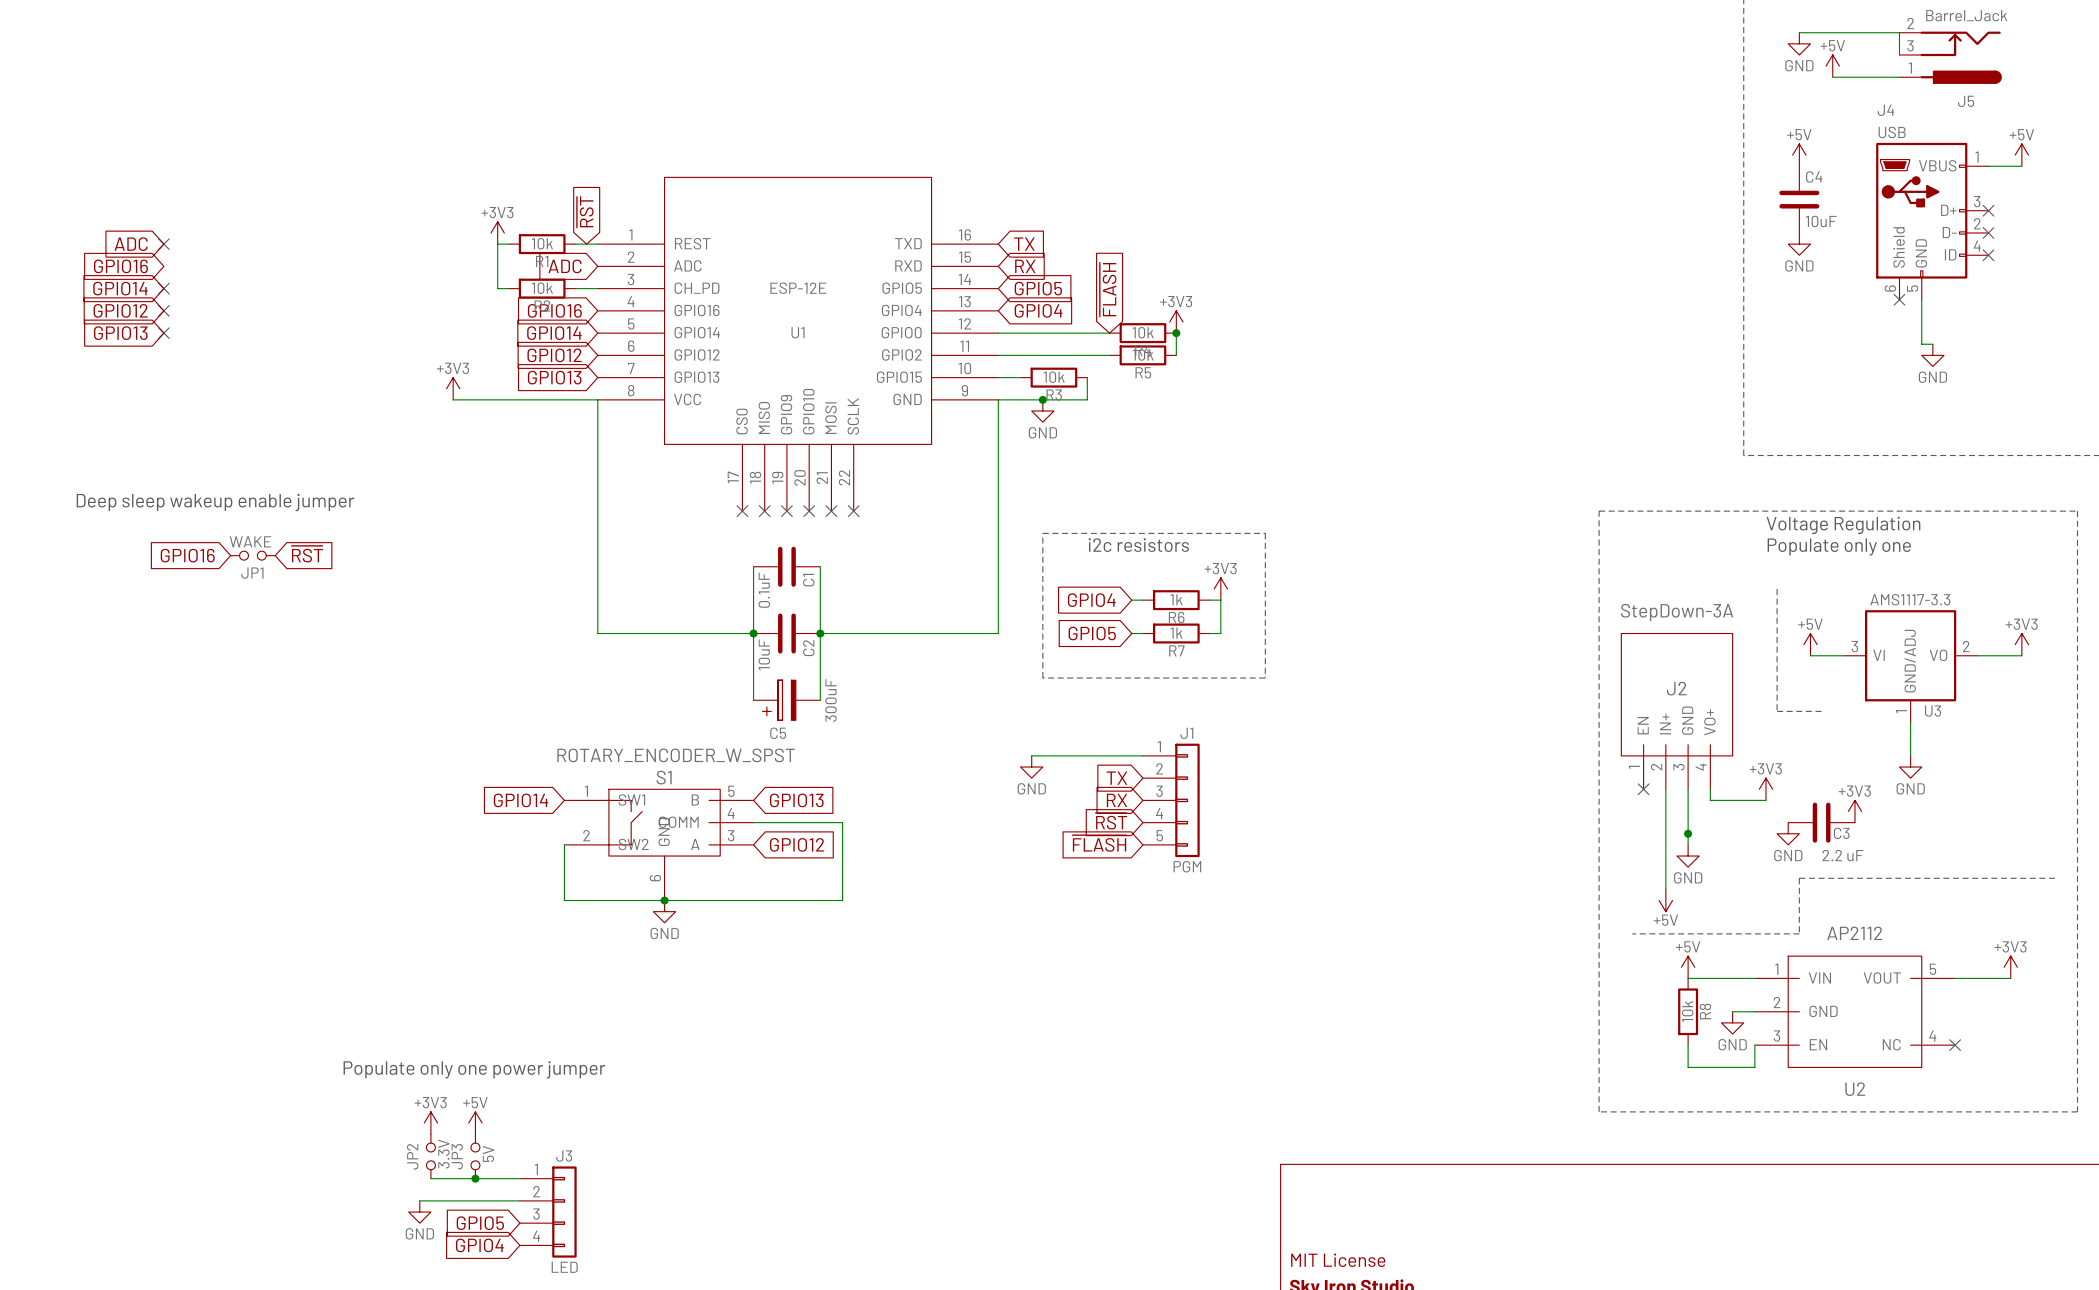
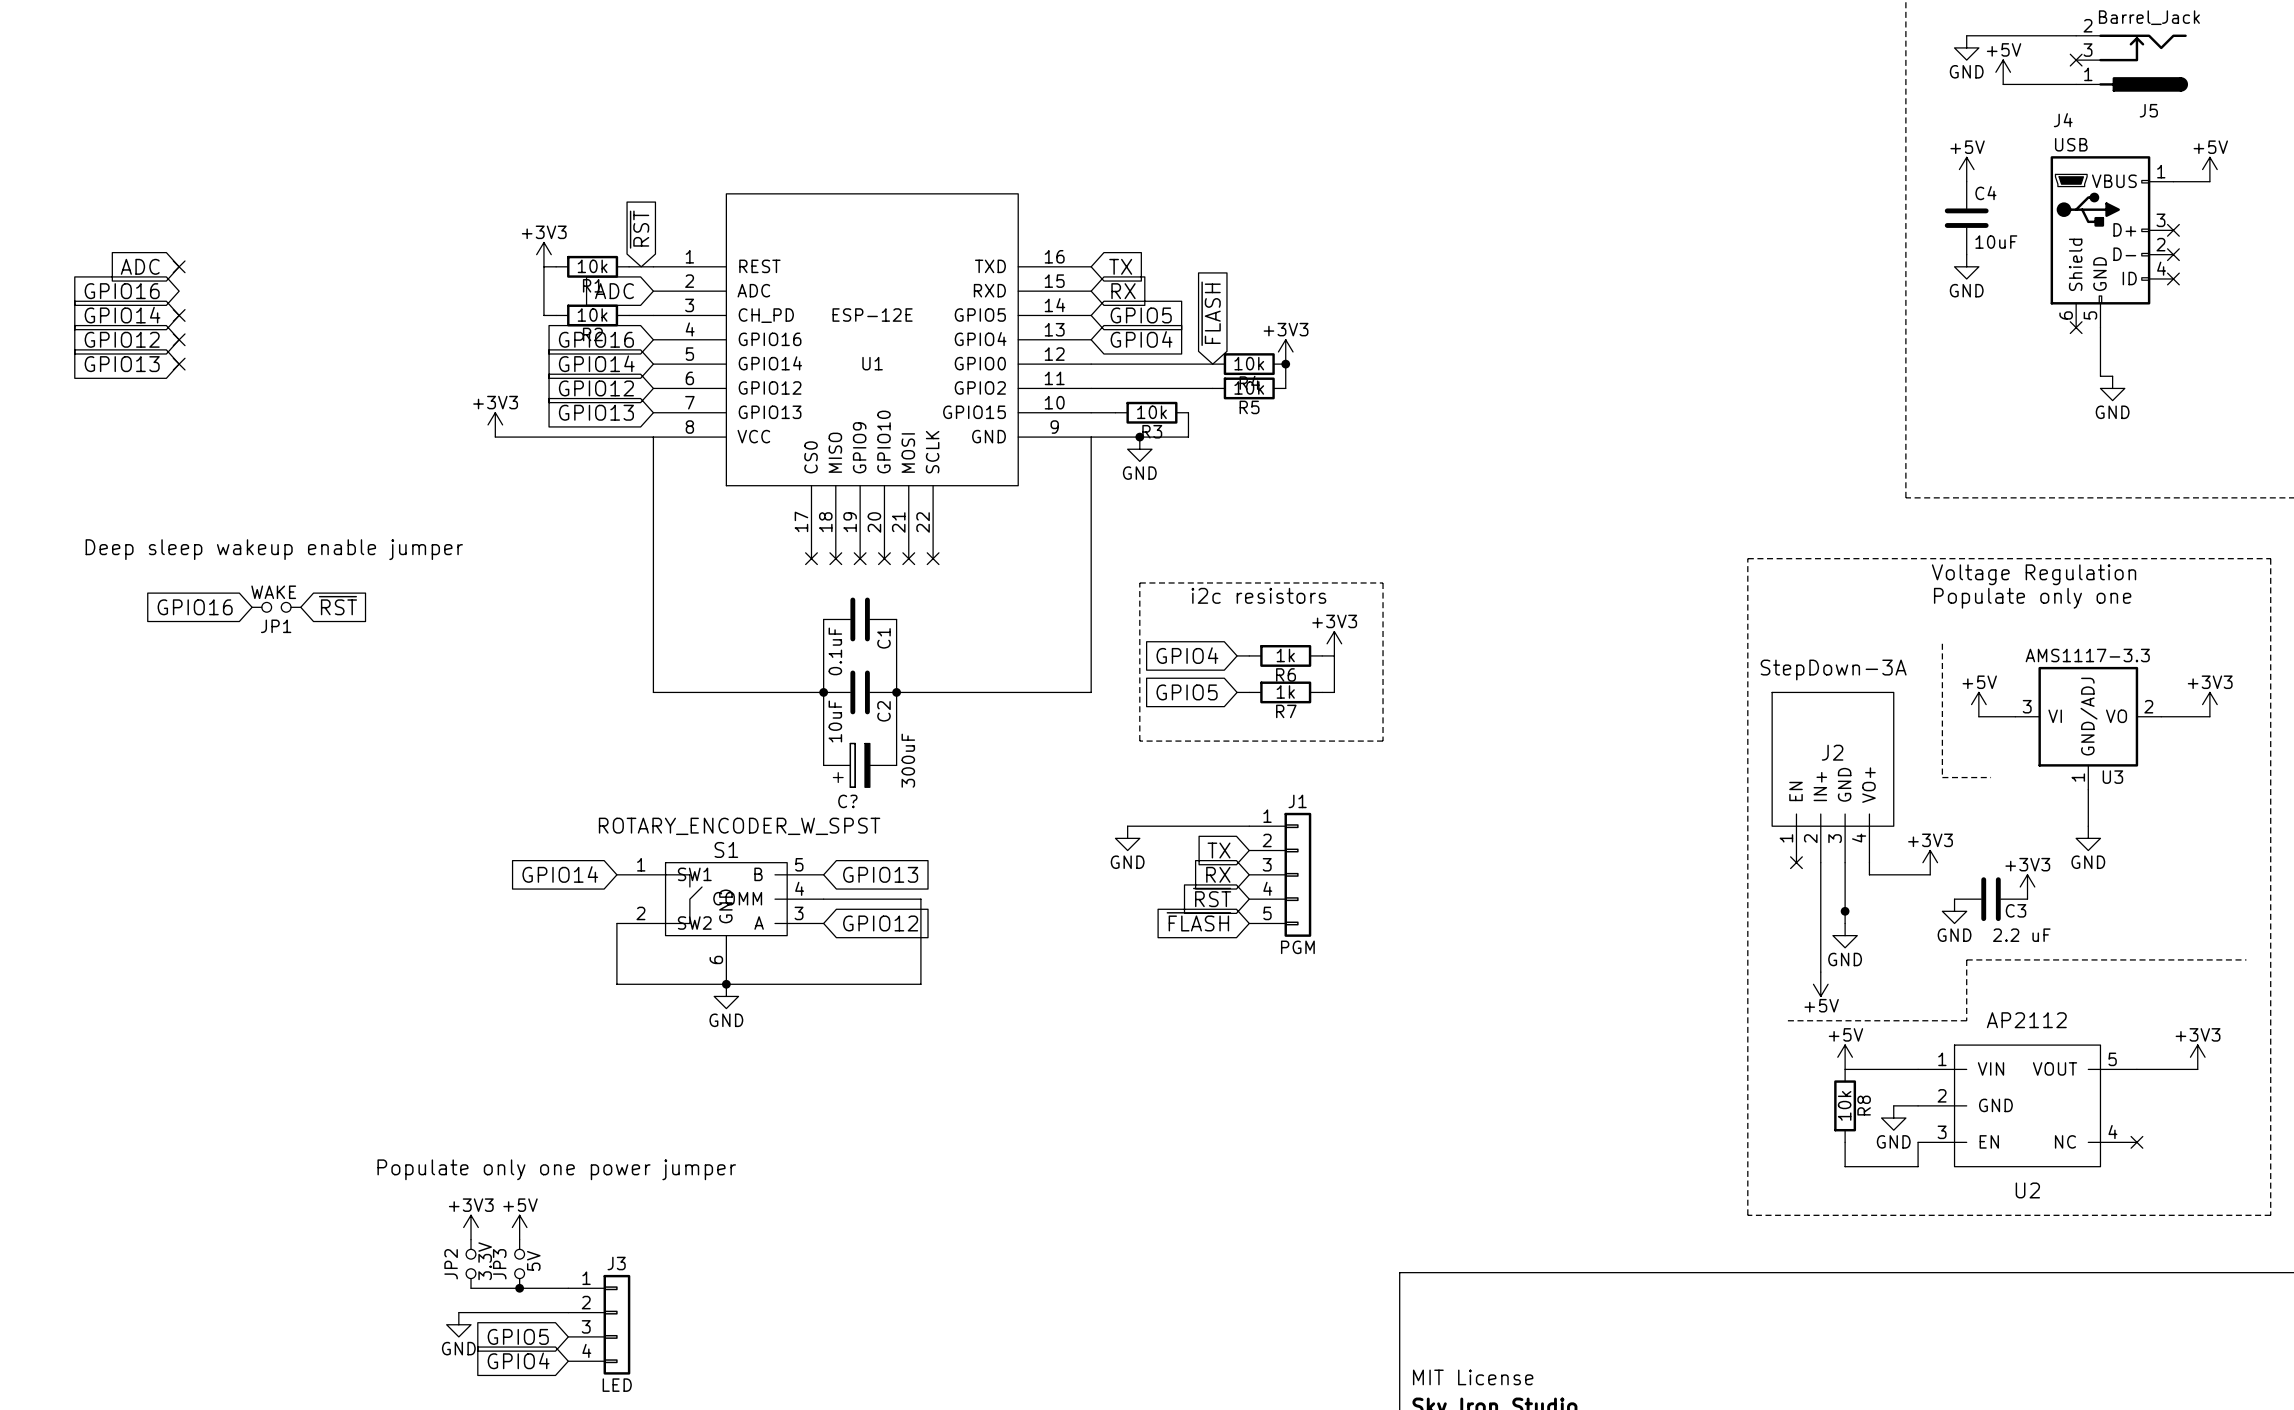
wire: (1899, 32) (1899, 54) -> none
no-connect mark: none -> (2076, 60)
C5 name: C5 (778, 733) -> C? (847, 801)

